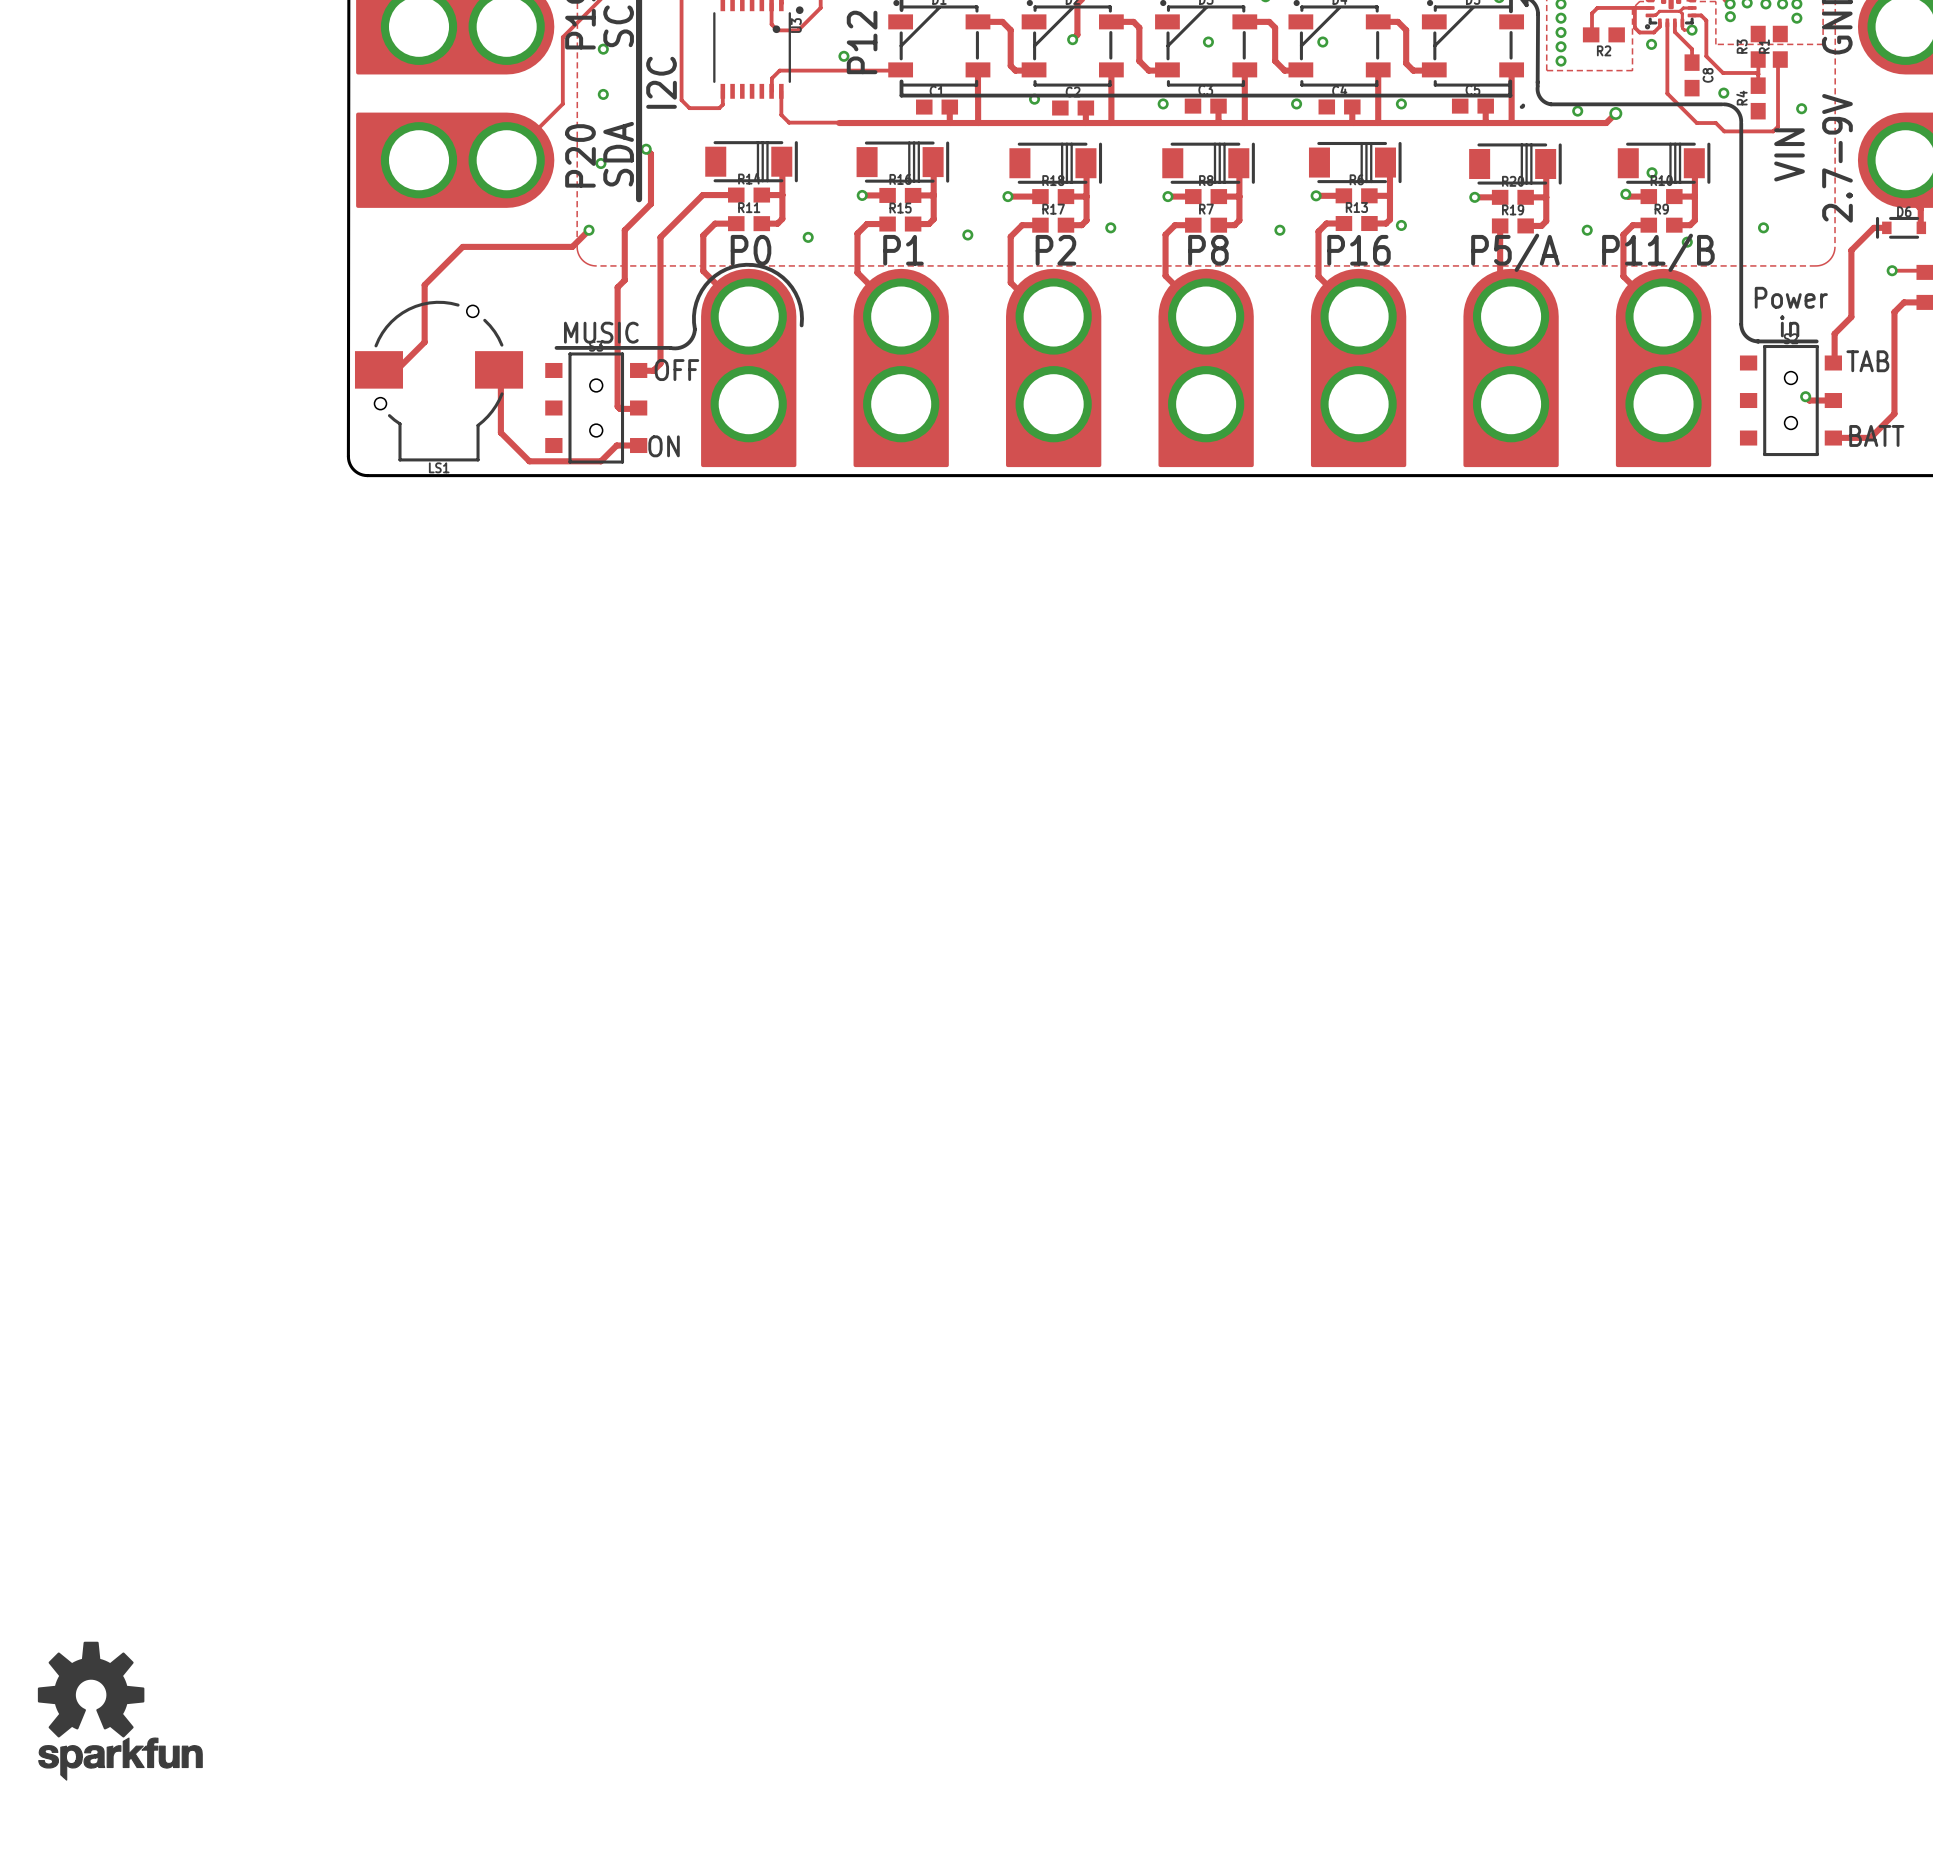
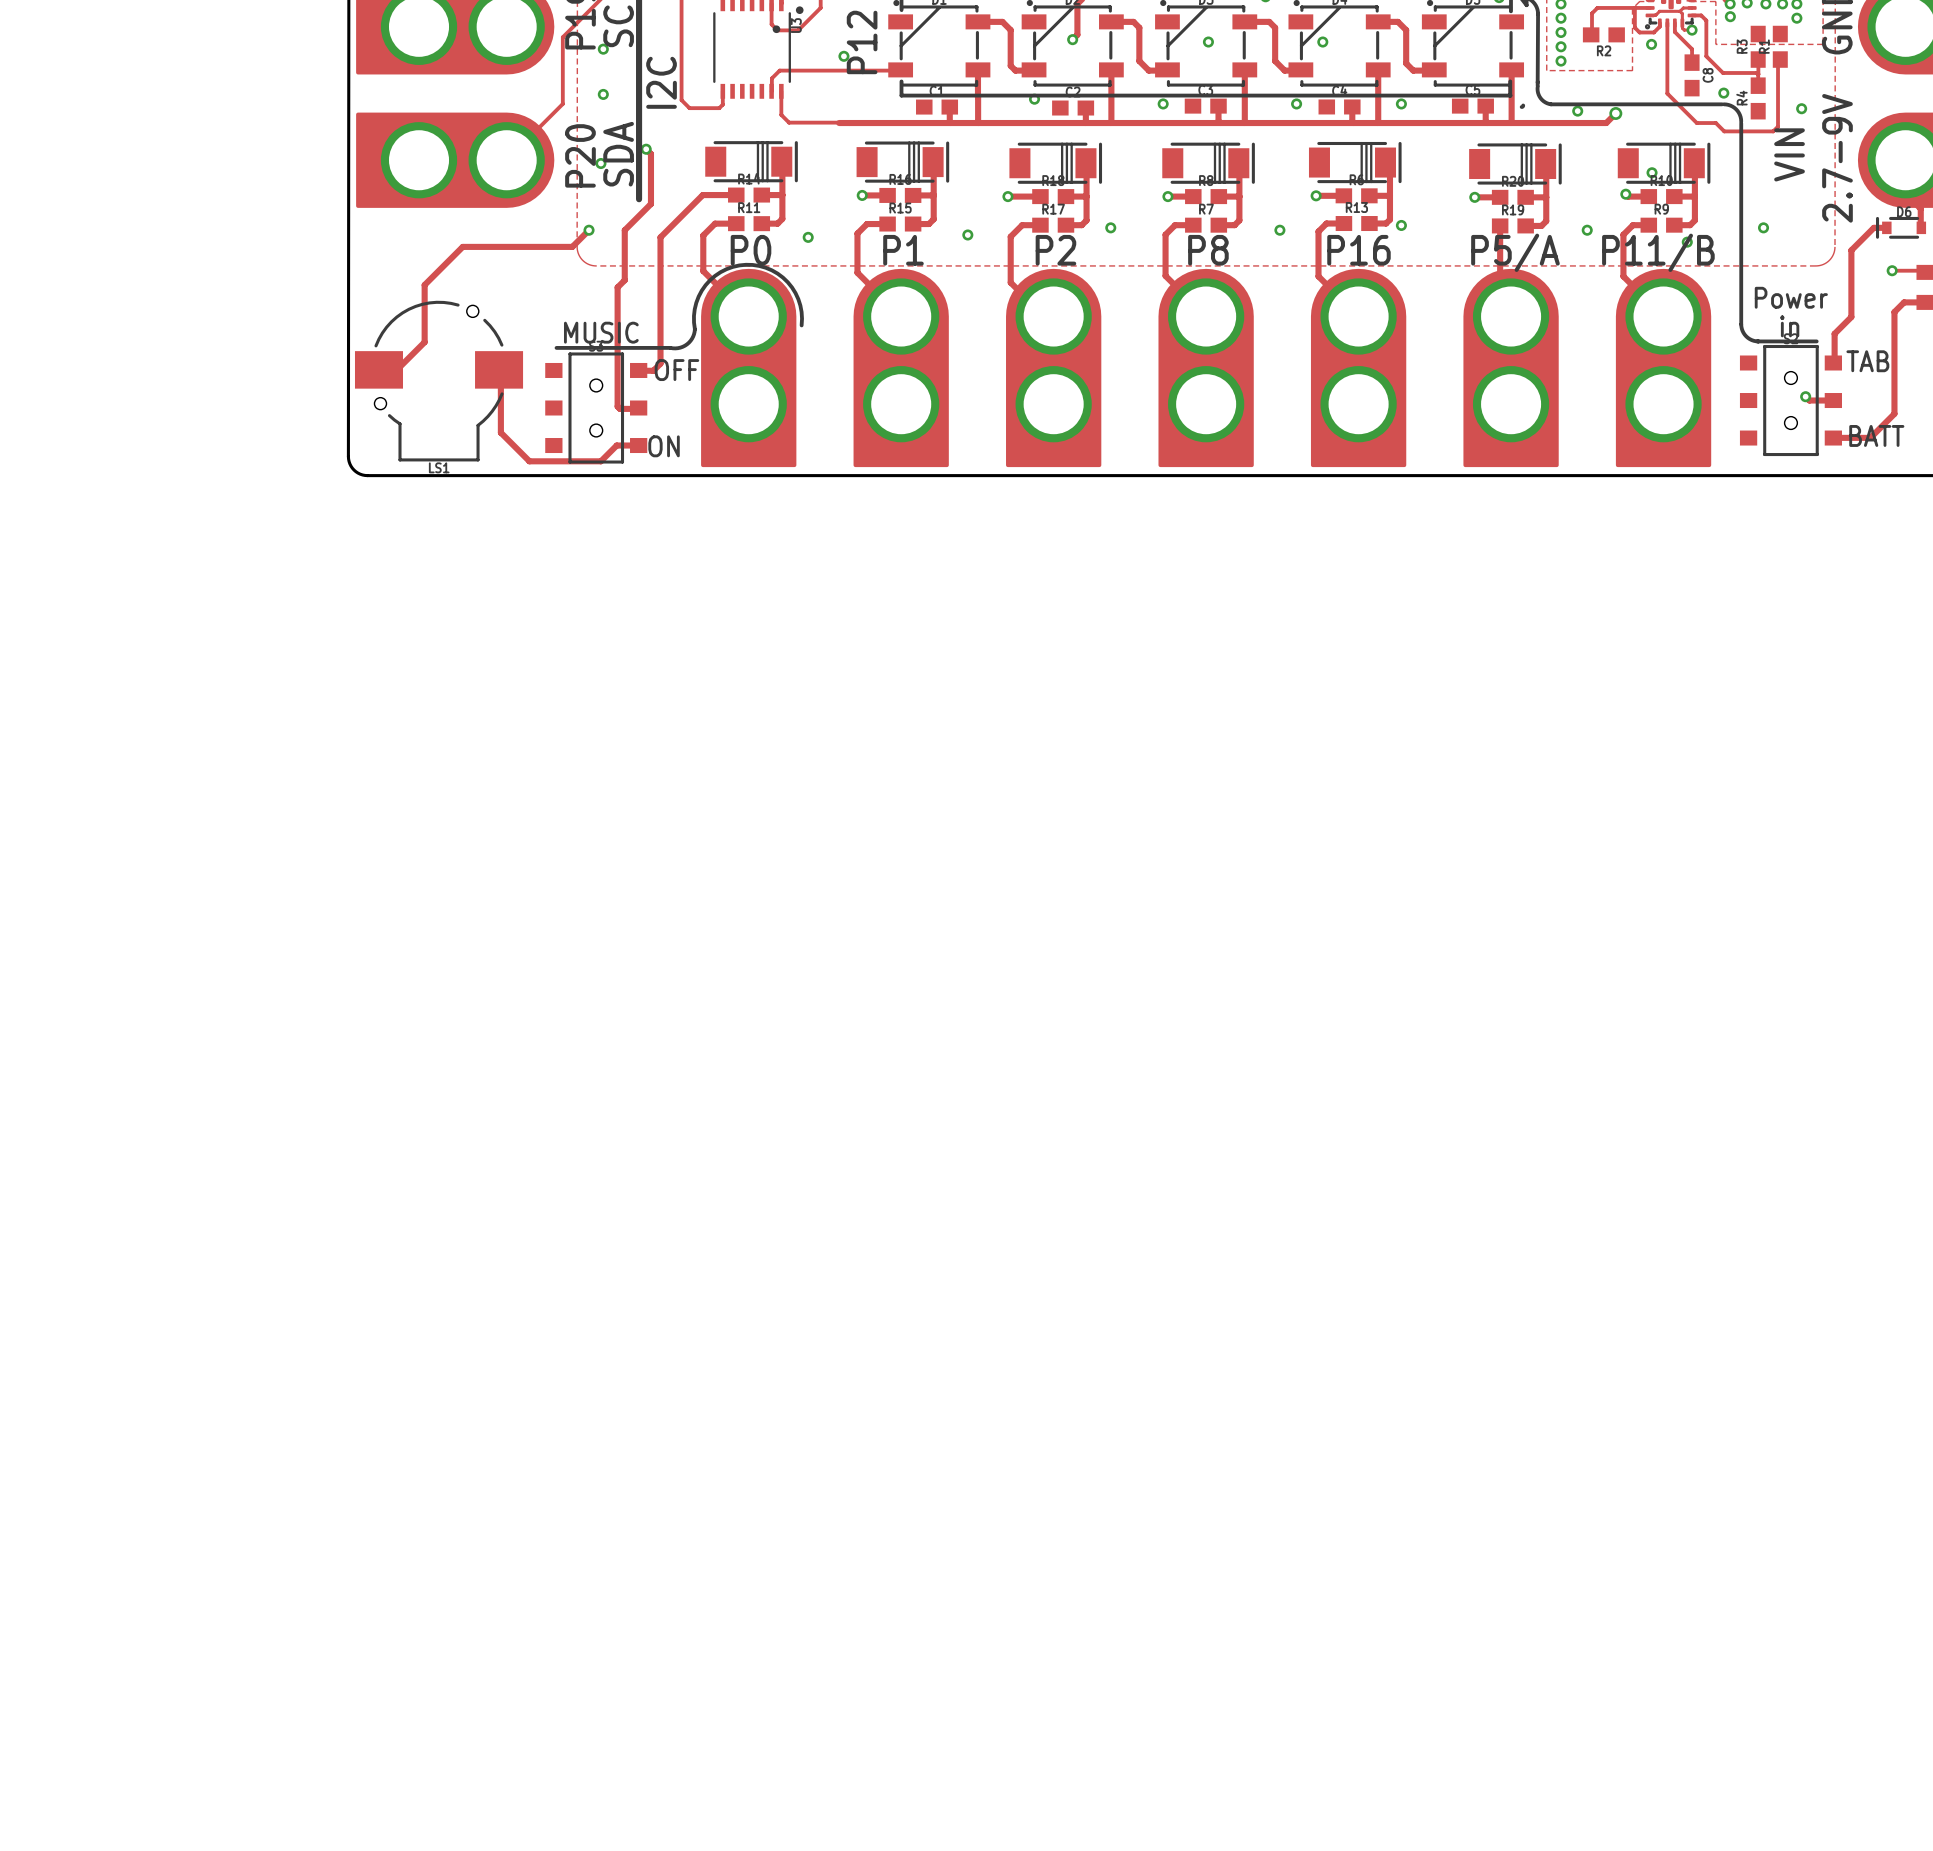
drawing: [37, 1641, 203, 1781] -> none

